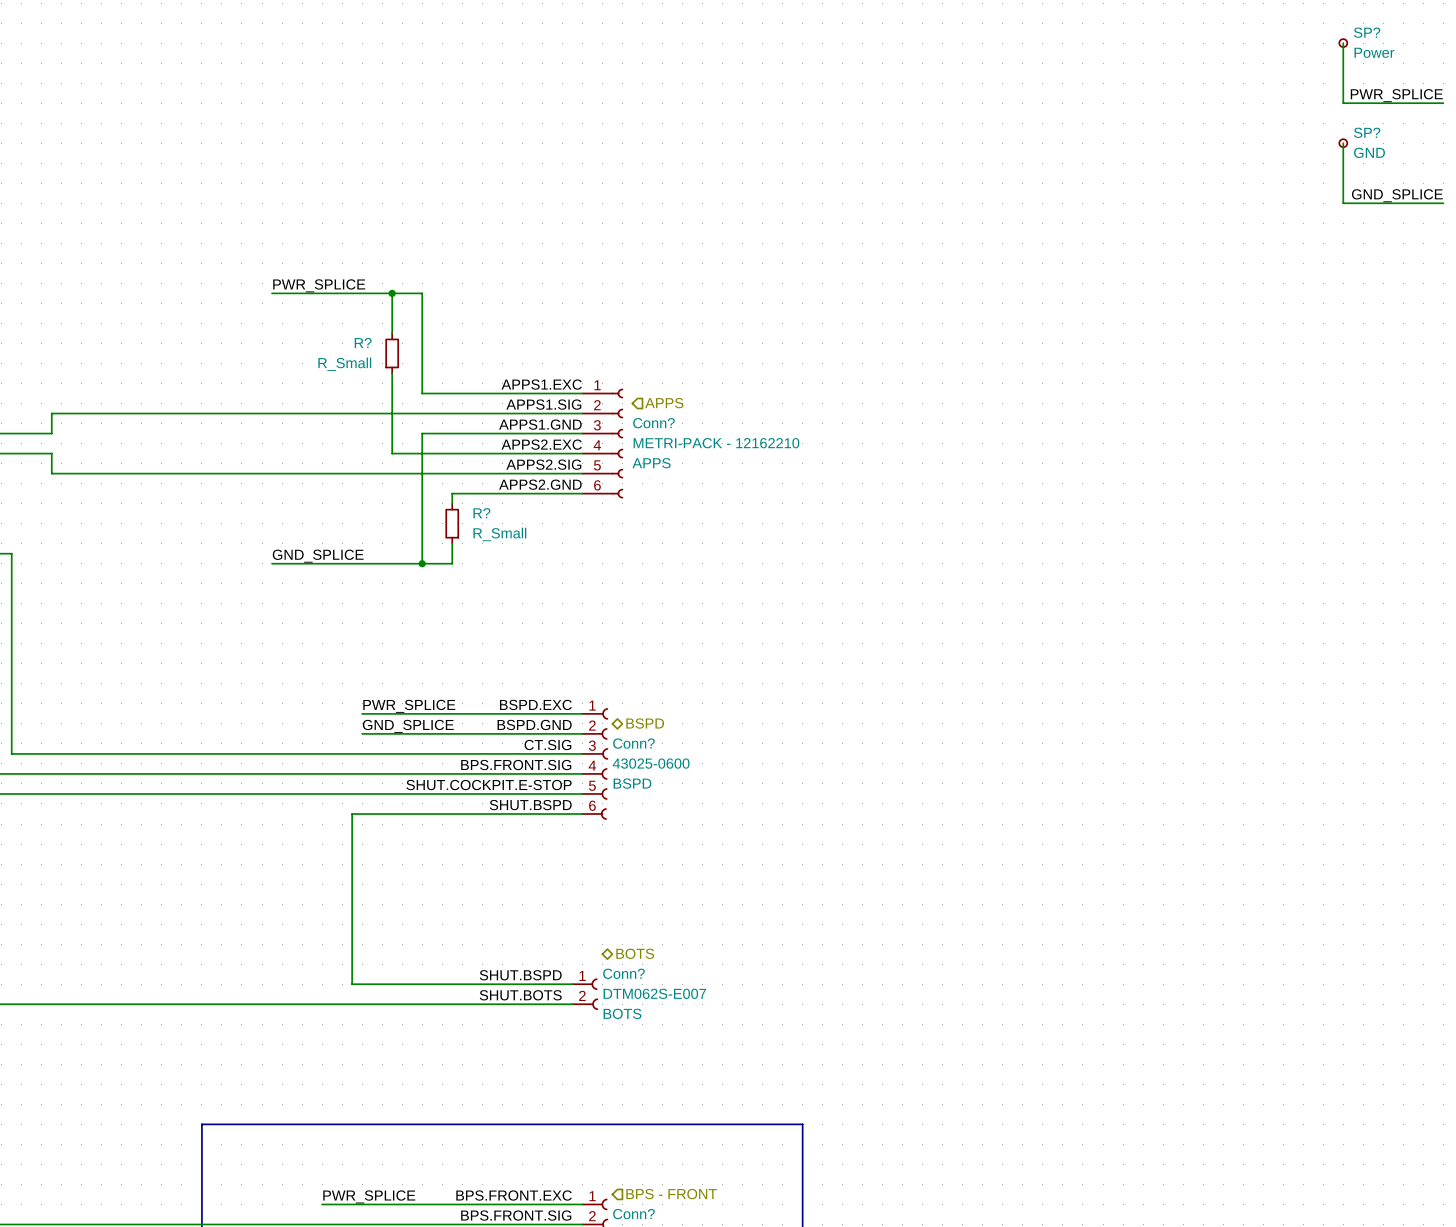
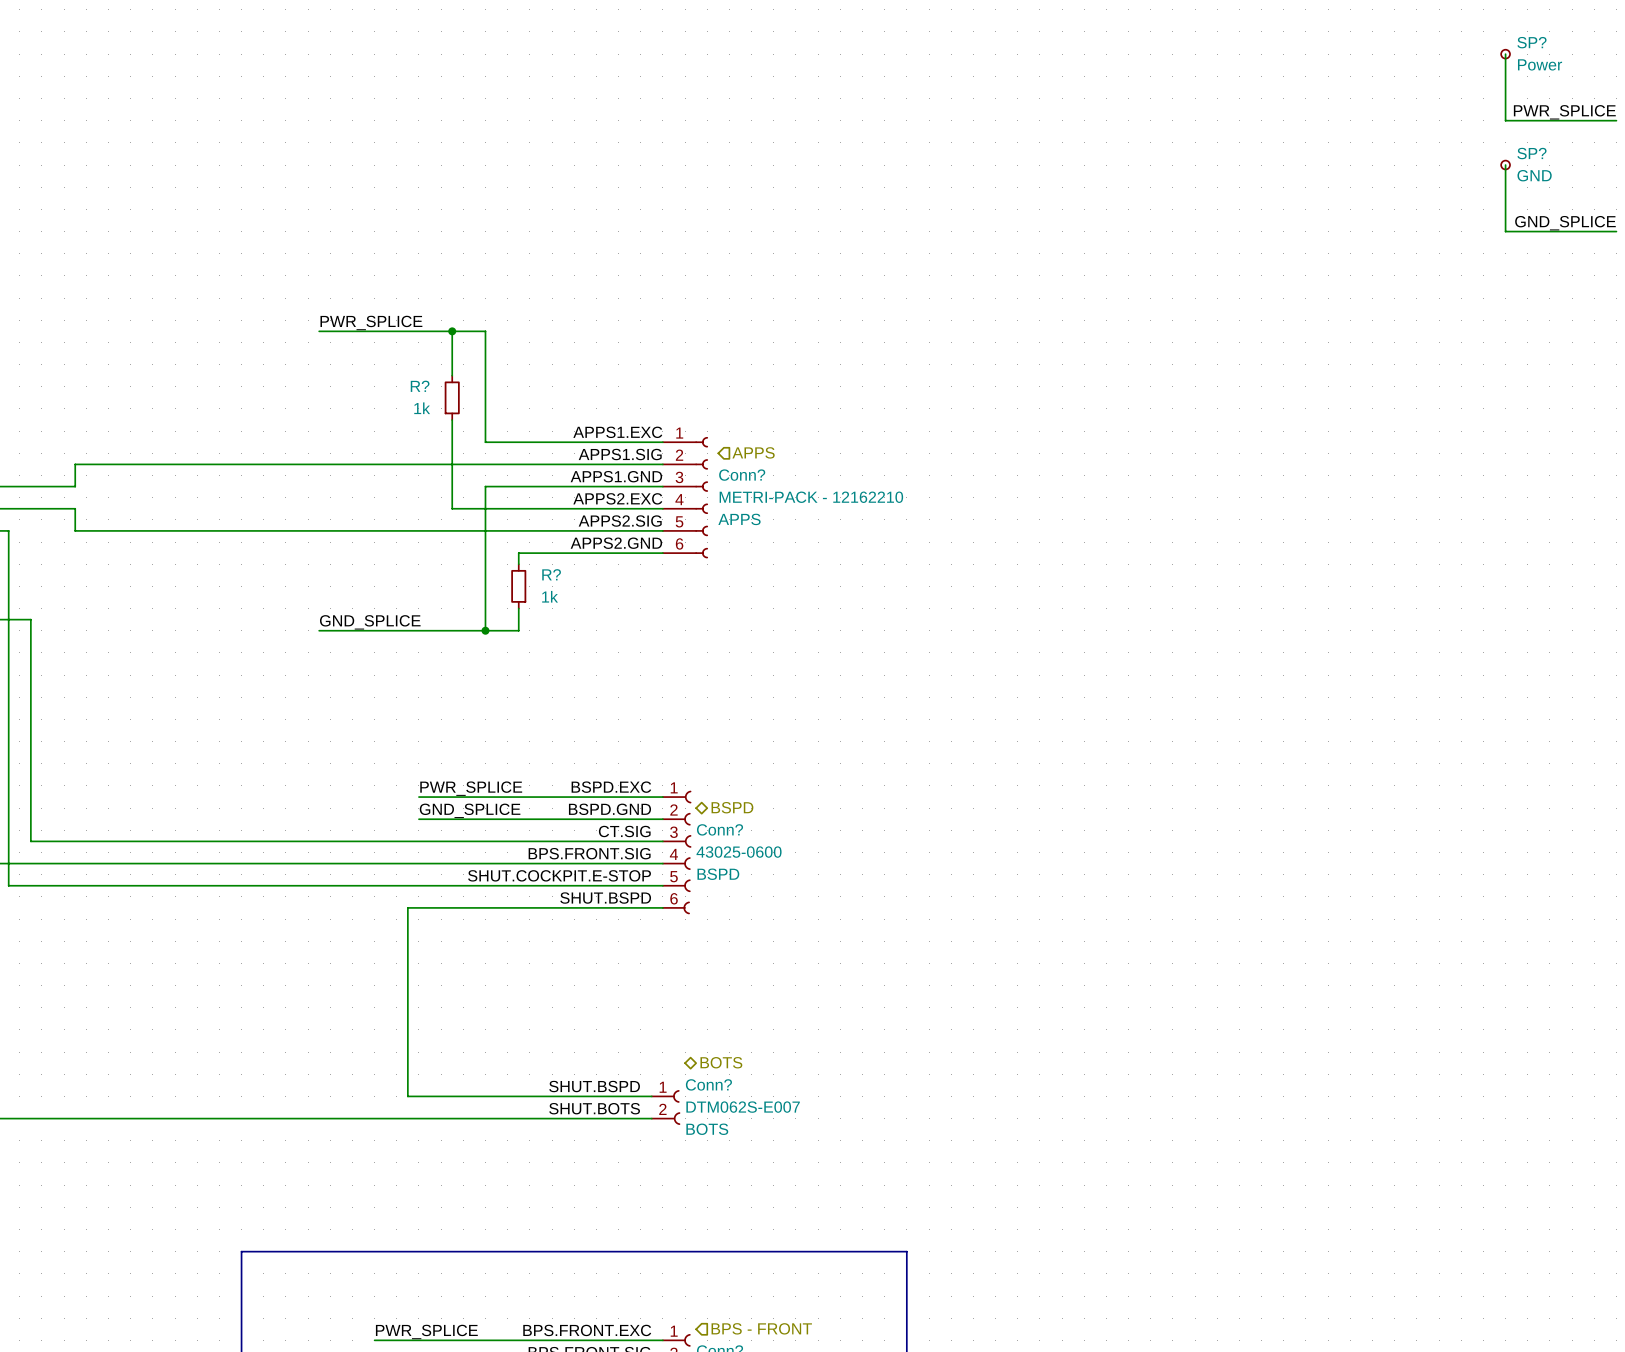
R? value: R_Small (344, 364) -> 1k (422, 408)
R? value: R_Small (499, 534) -> 1k (550, 596)

